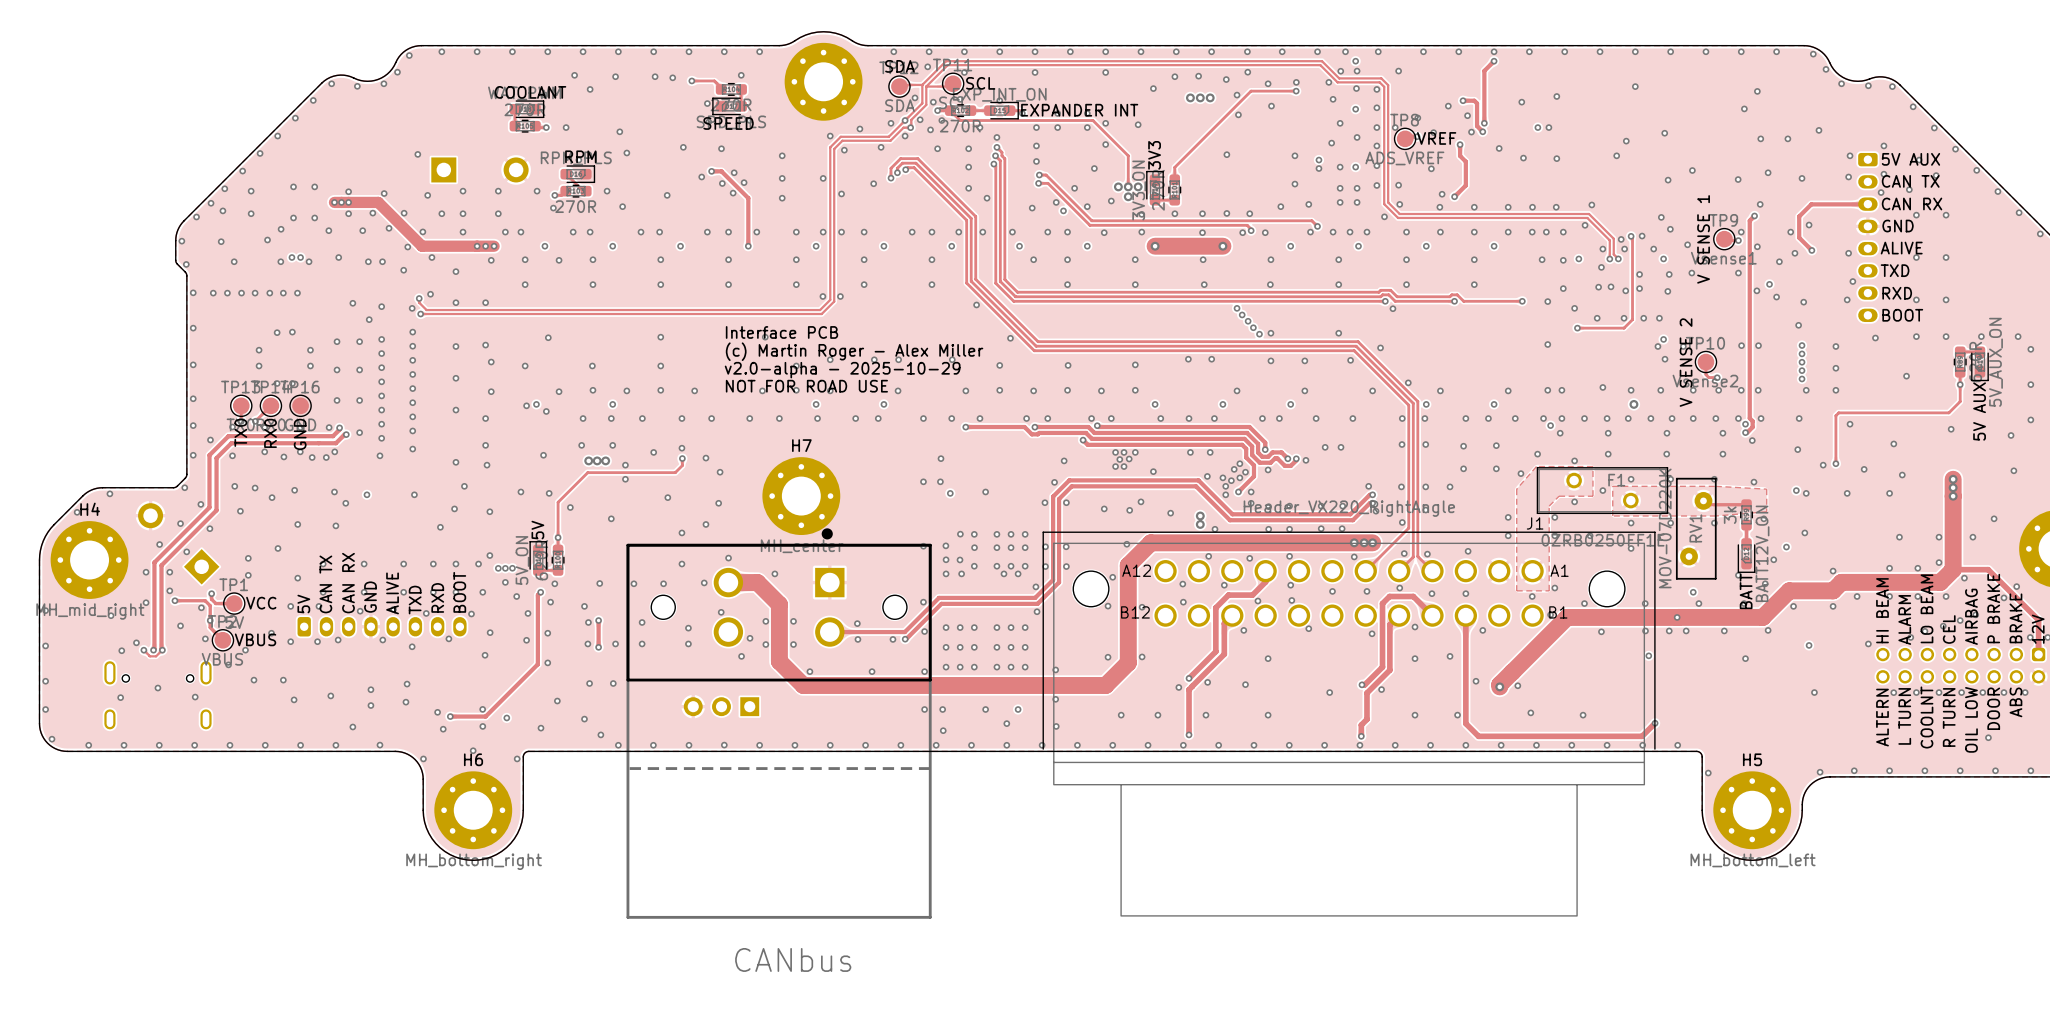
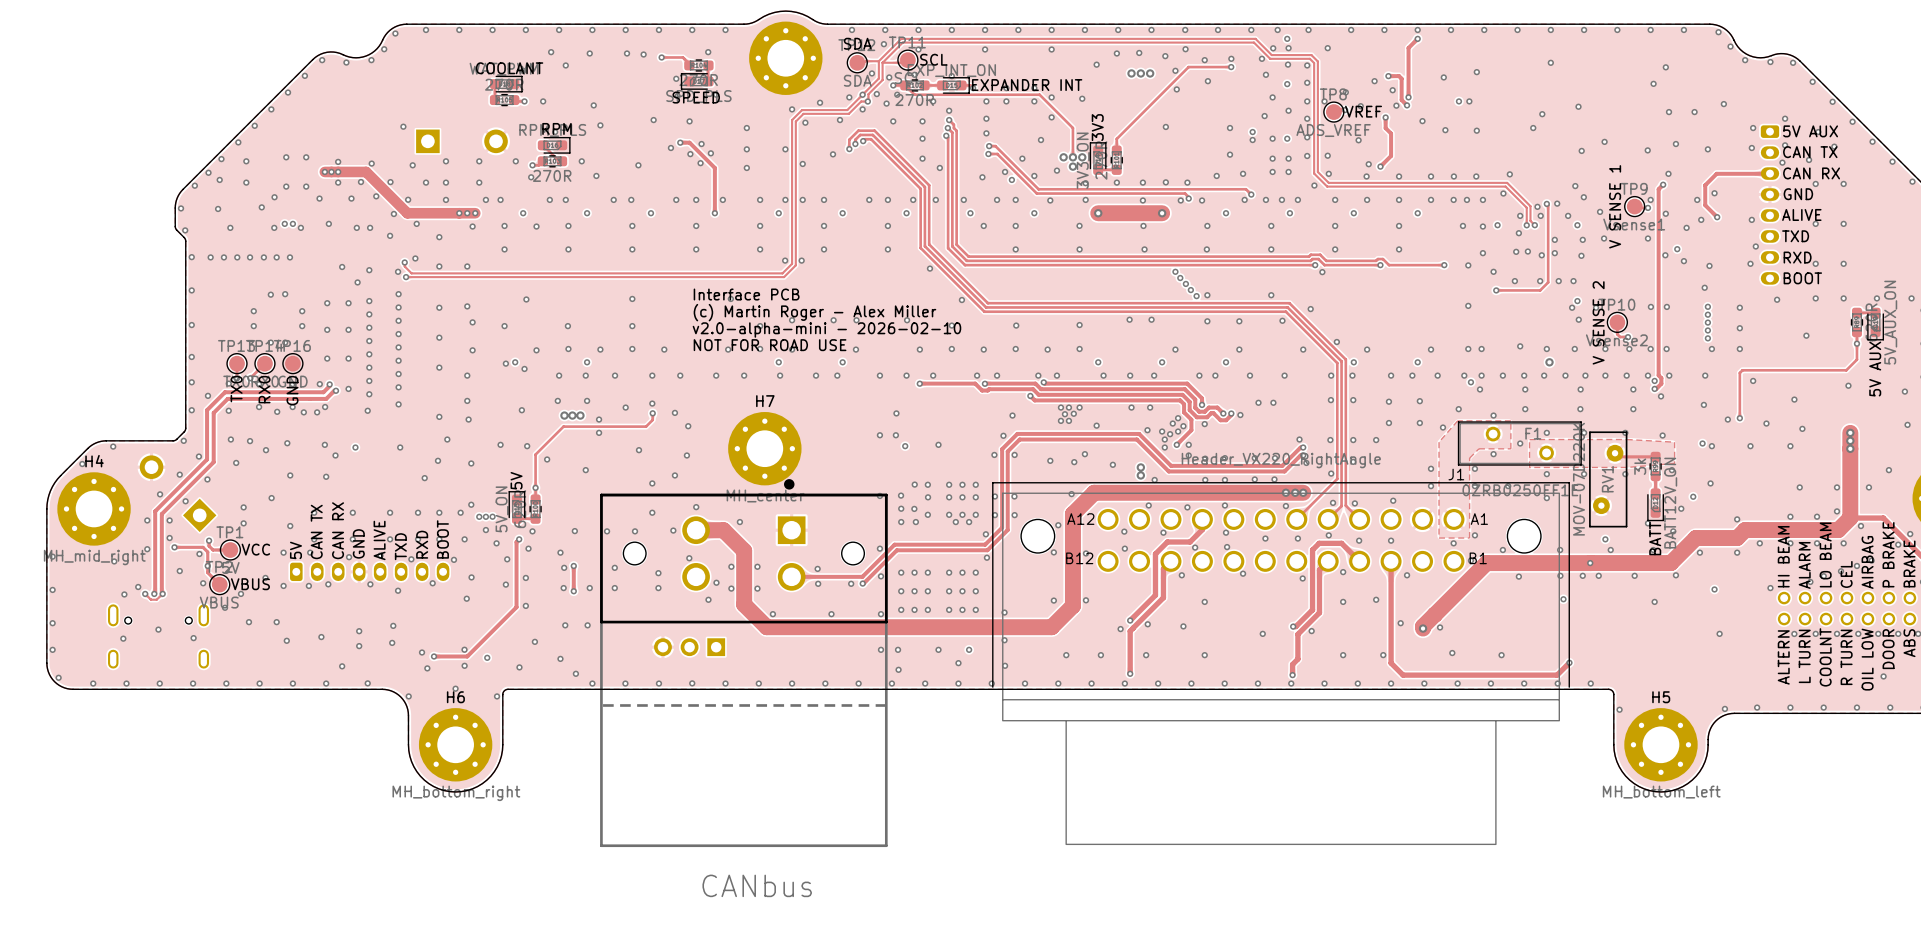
text: v2.0-alpha - 2025-10-29 (842, 370) -> v2.0-alpha-mini - 2026-02-10 (826, 330)

